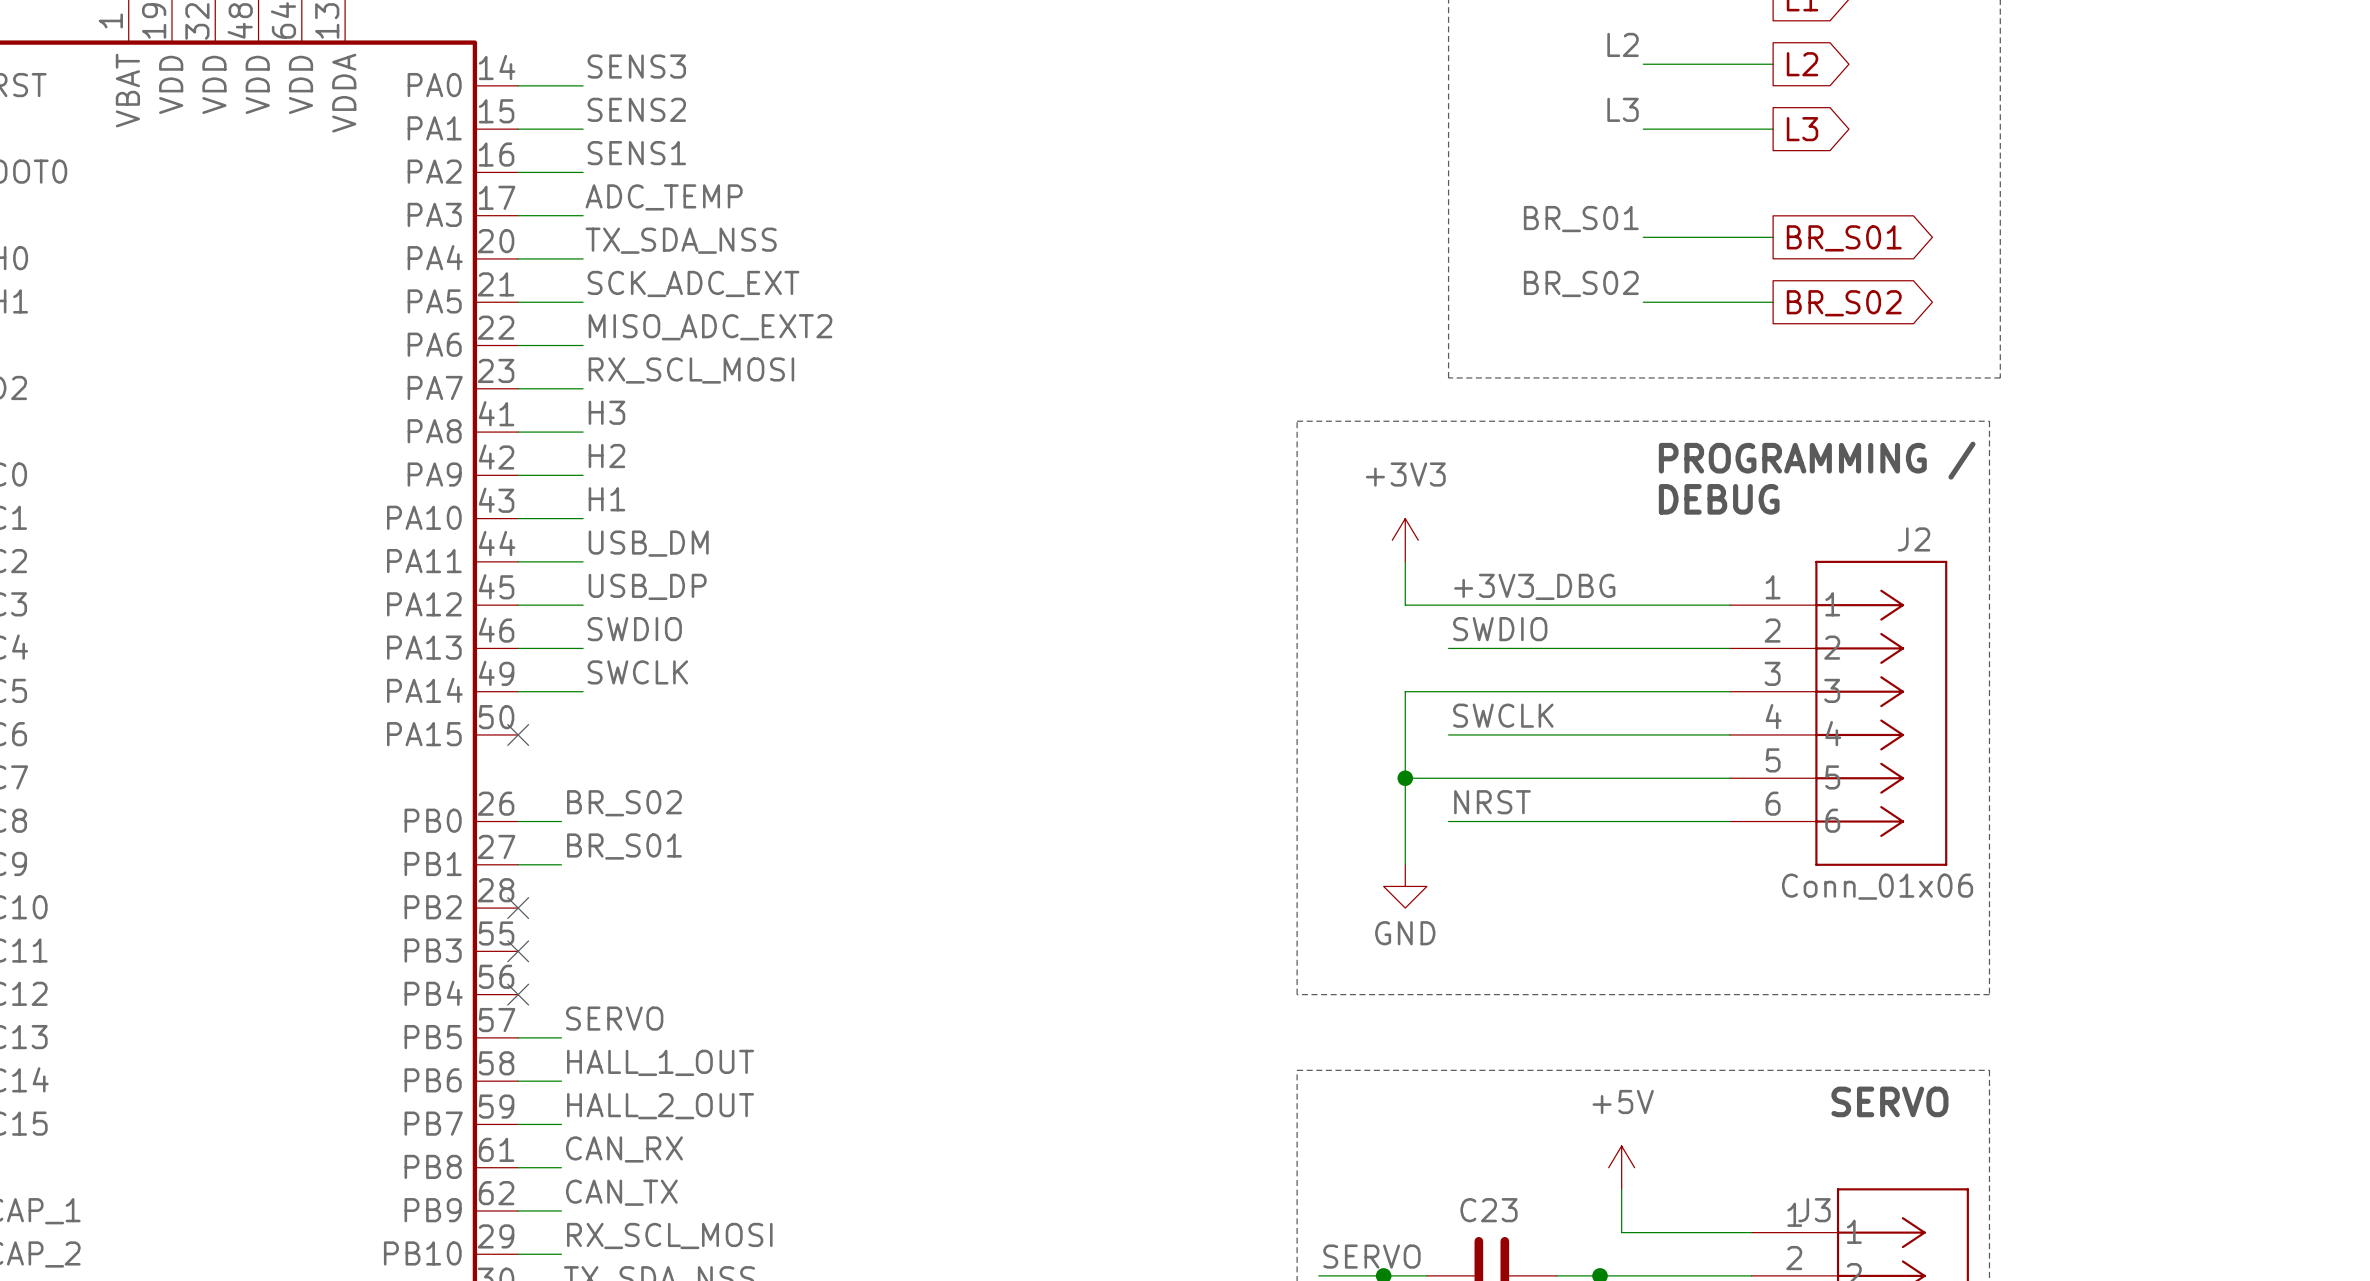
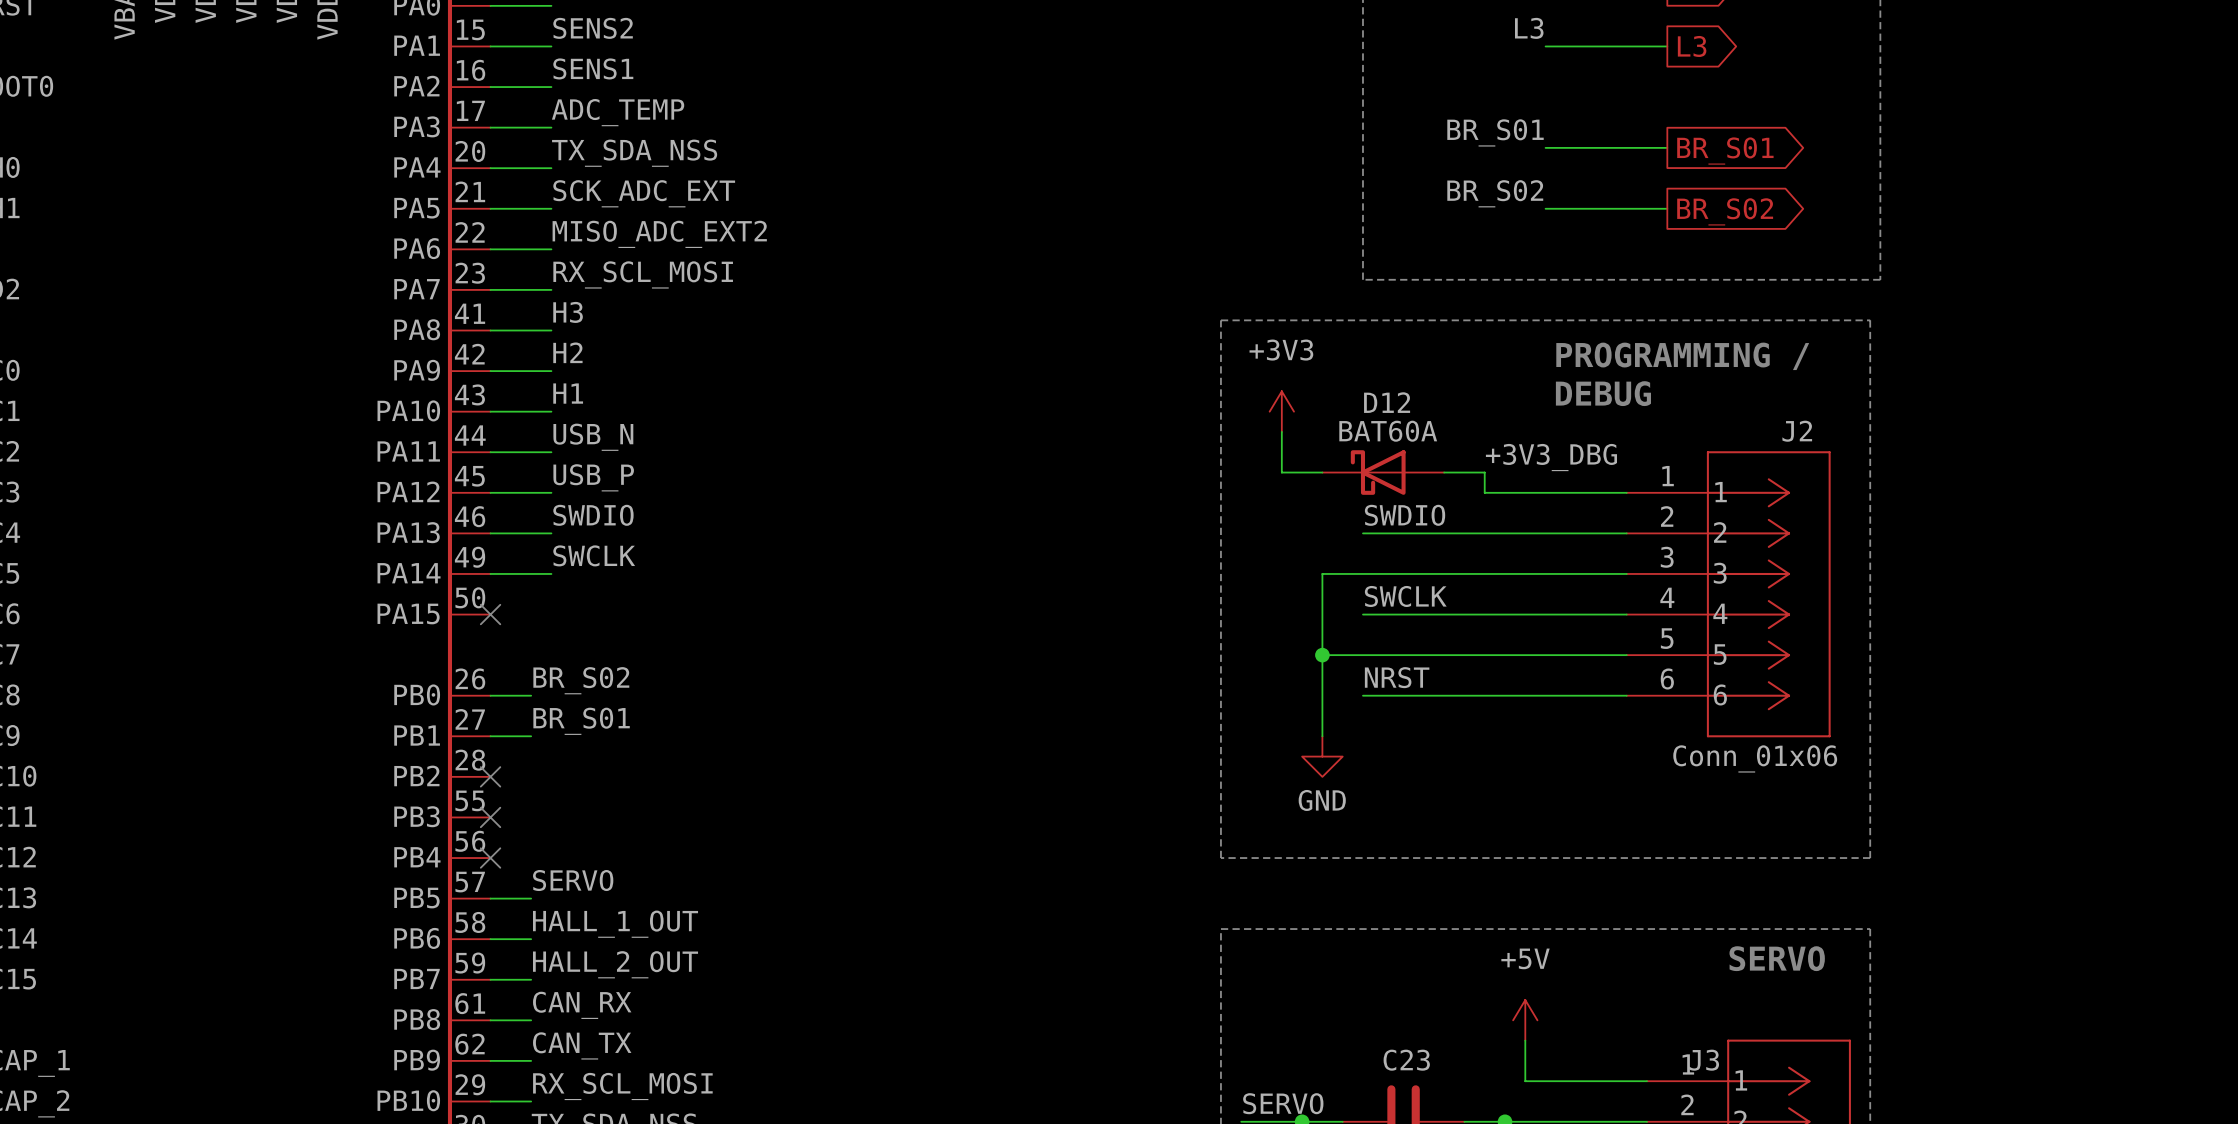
wire: none -> (1281, 431) (1281, 472) (1322, 472)
power symbol position: +3V3 (1405, 540) -> +3V3 (1281, 411)
label: USB_DM (648, 543) -> USB_N (593, 437)
wire: (1405, 561) (1405, 605) (1578, 605) -> (1444, 472) (1484, 472) (1484, 492)
D12: none -> BAT60A (1383, 472)
label: USB_DP (647, 586) -> USB_P (593, 477)
label position: +3V3_DBG (1534, 586) -> +3V3_DBG (1551, 457)

